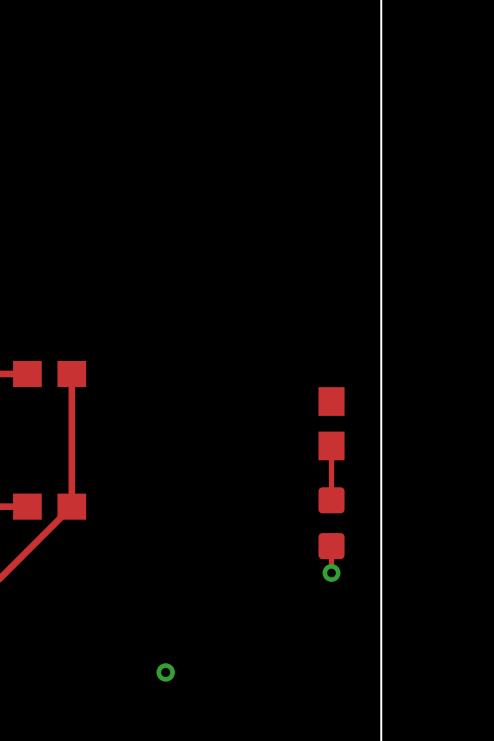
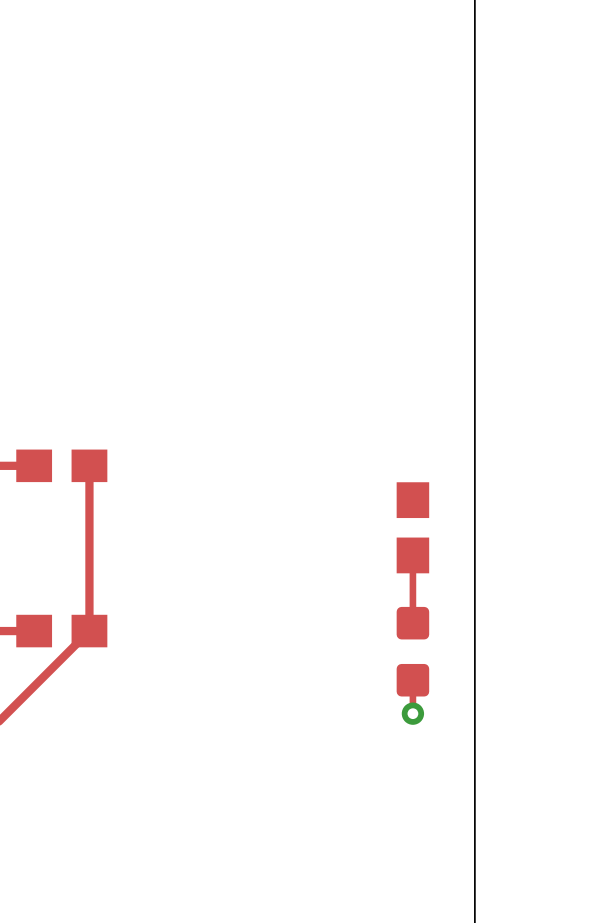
via: (165, 672) -> none

